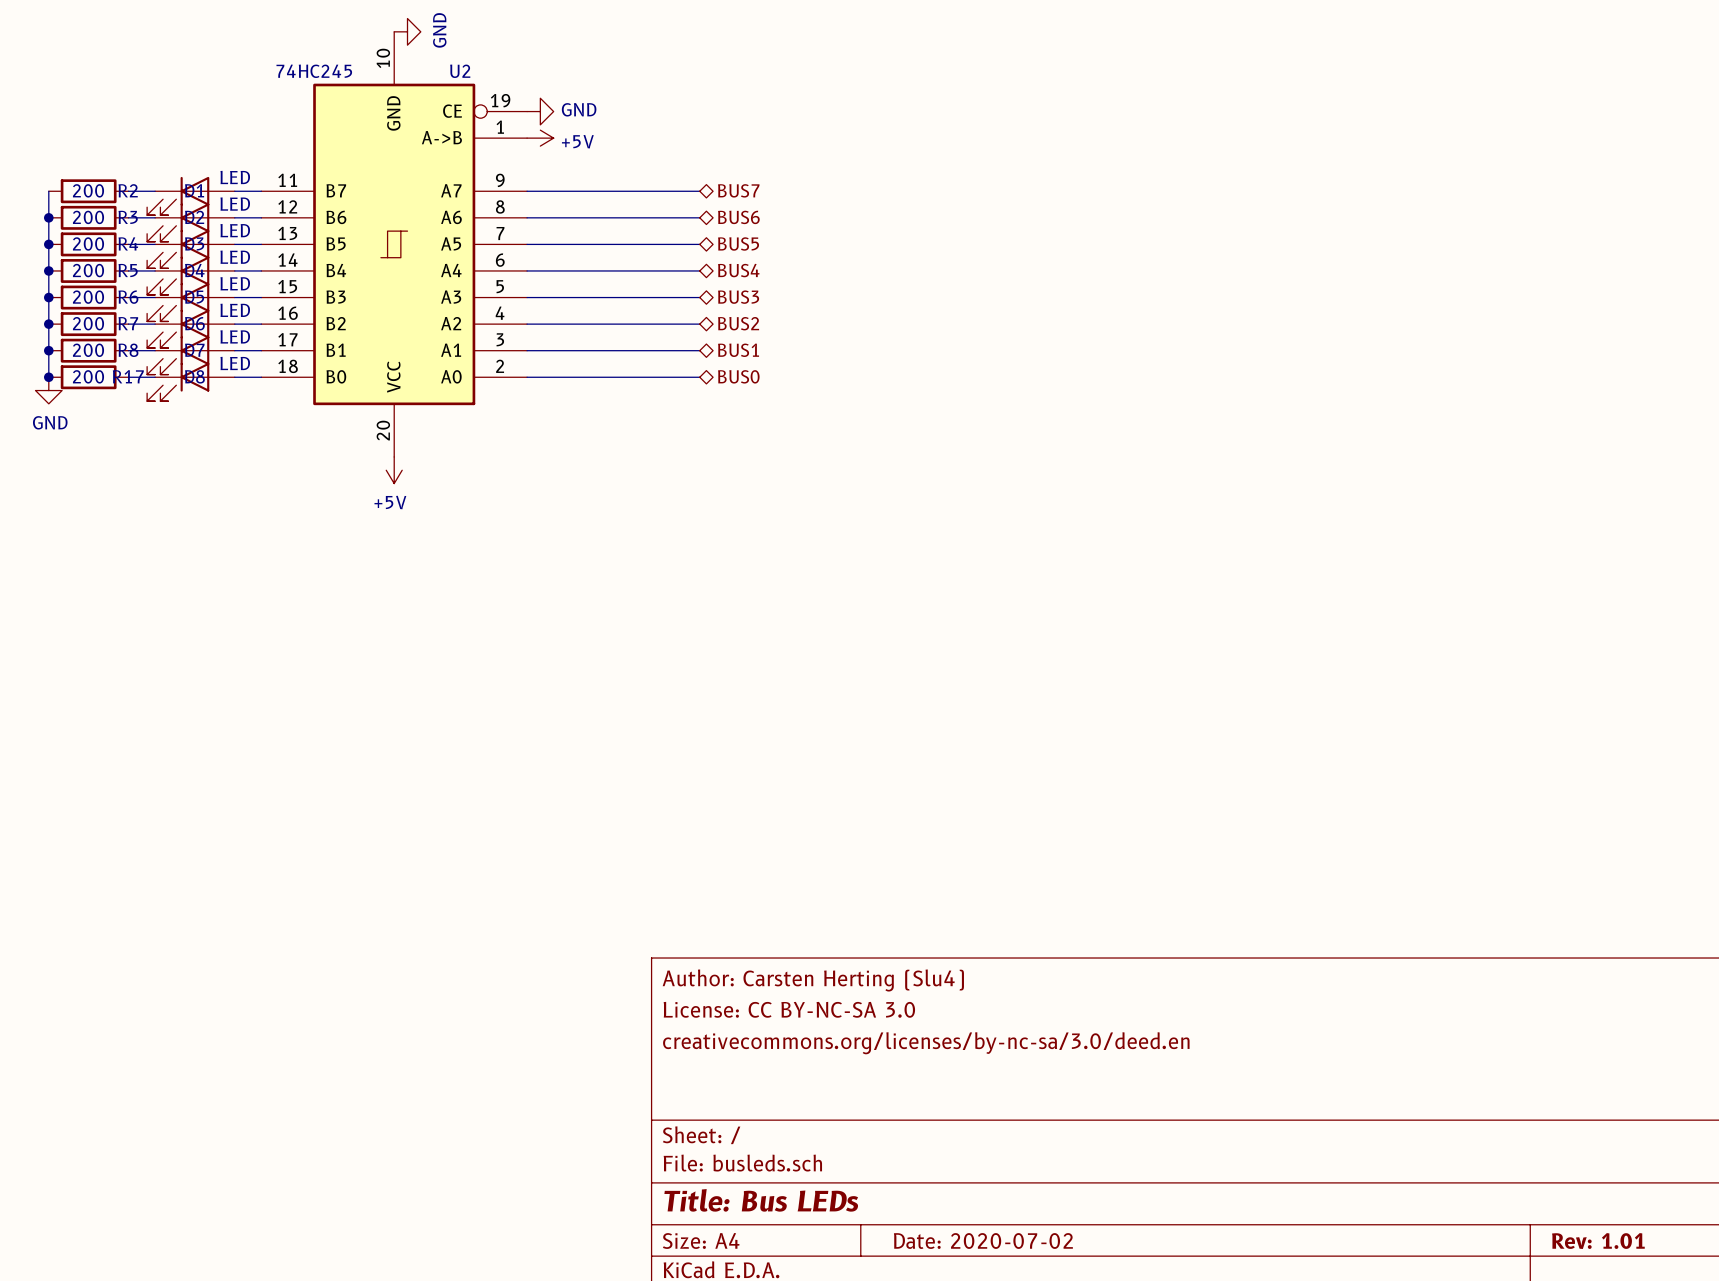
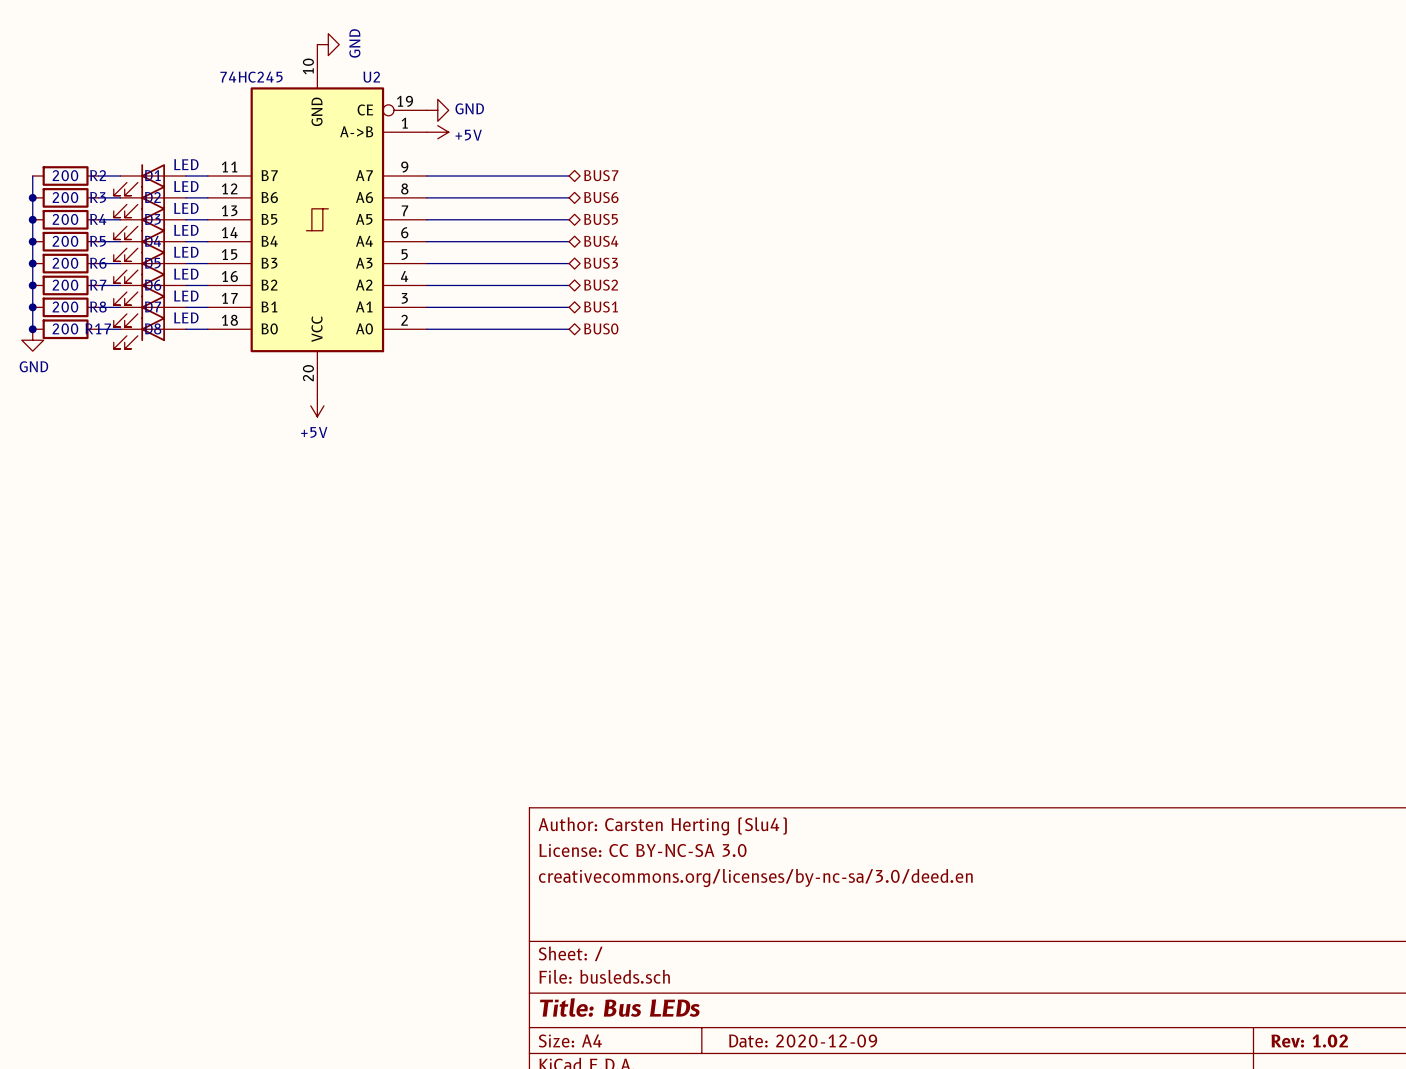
title block: Date: 2020-07-02 (983, 1241) -> Date: 2020-12-09 (803, 1040)
title block: Rev: 1.01 (1598, 1241) -> Rev: 1.02 (1309, 1041)

